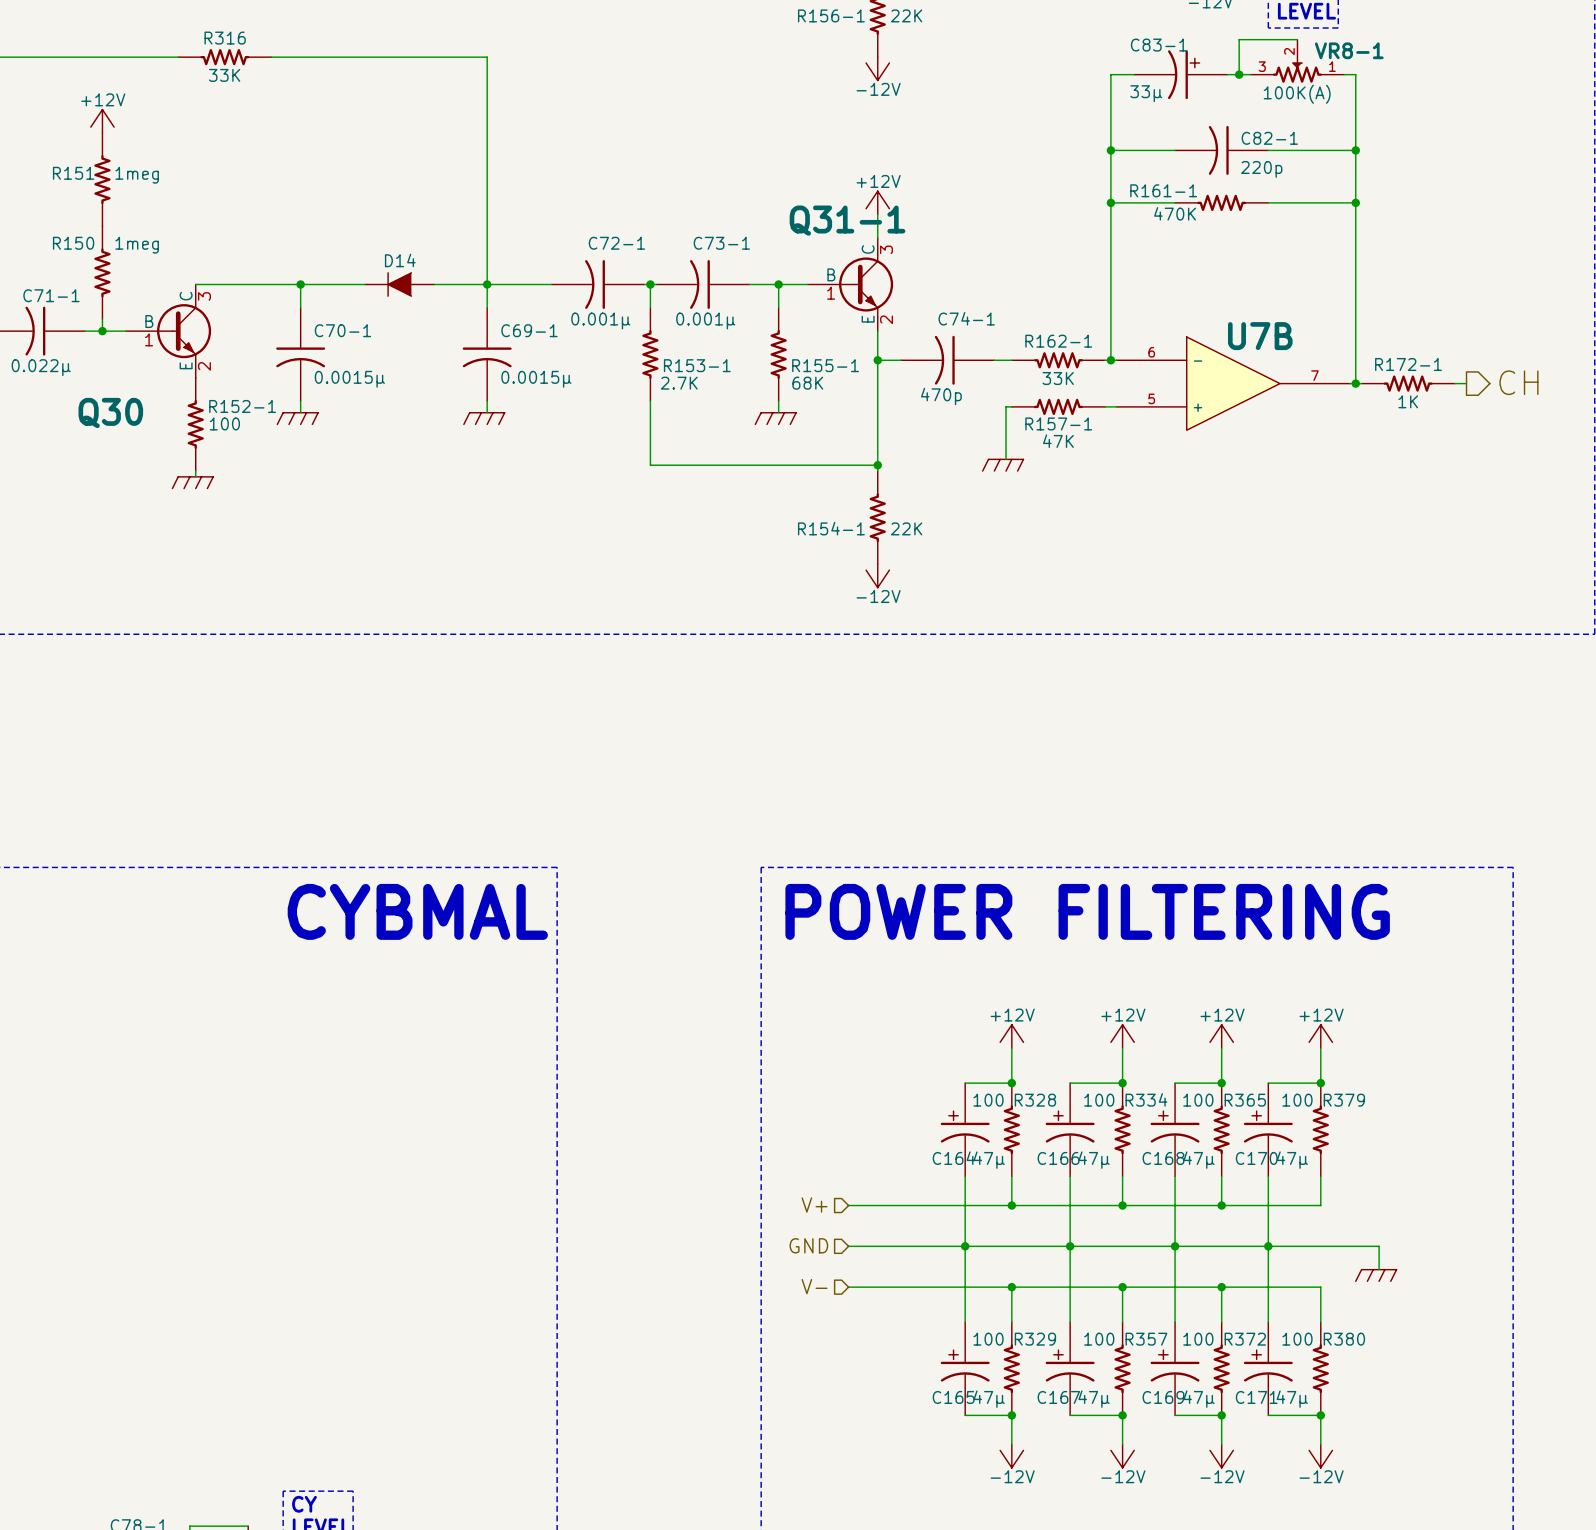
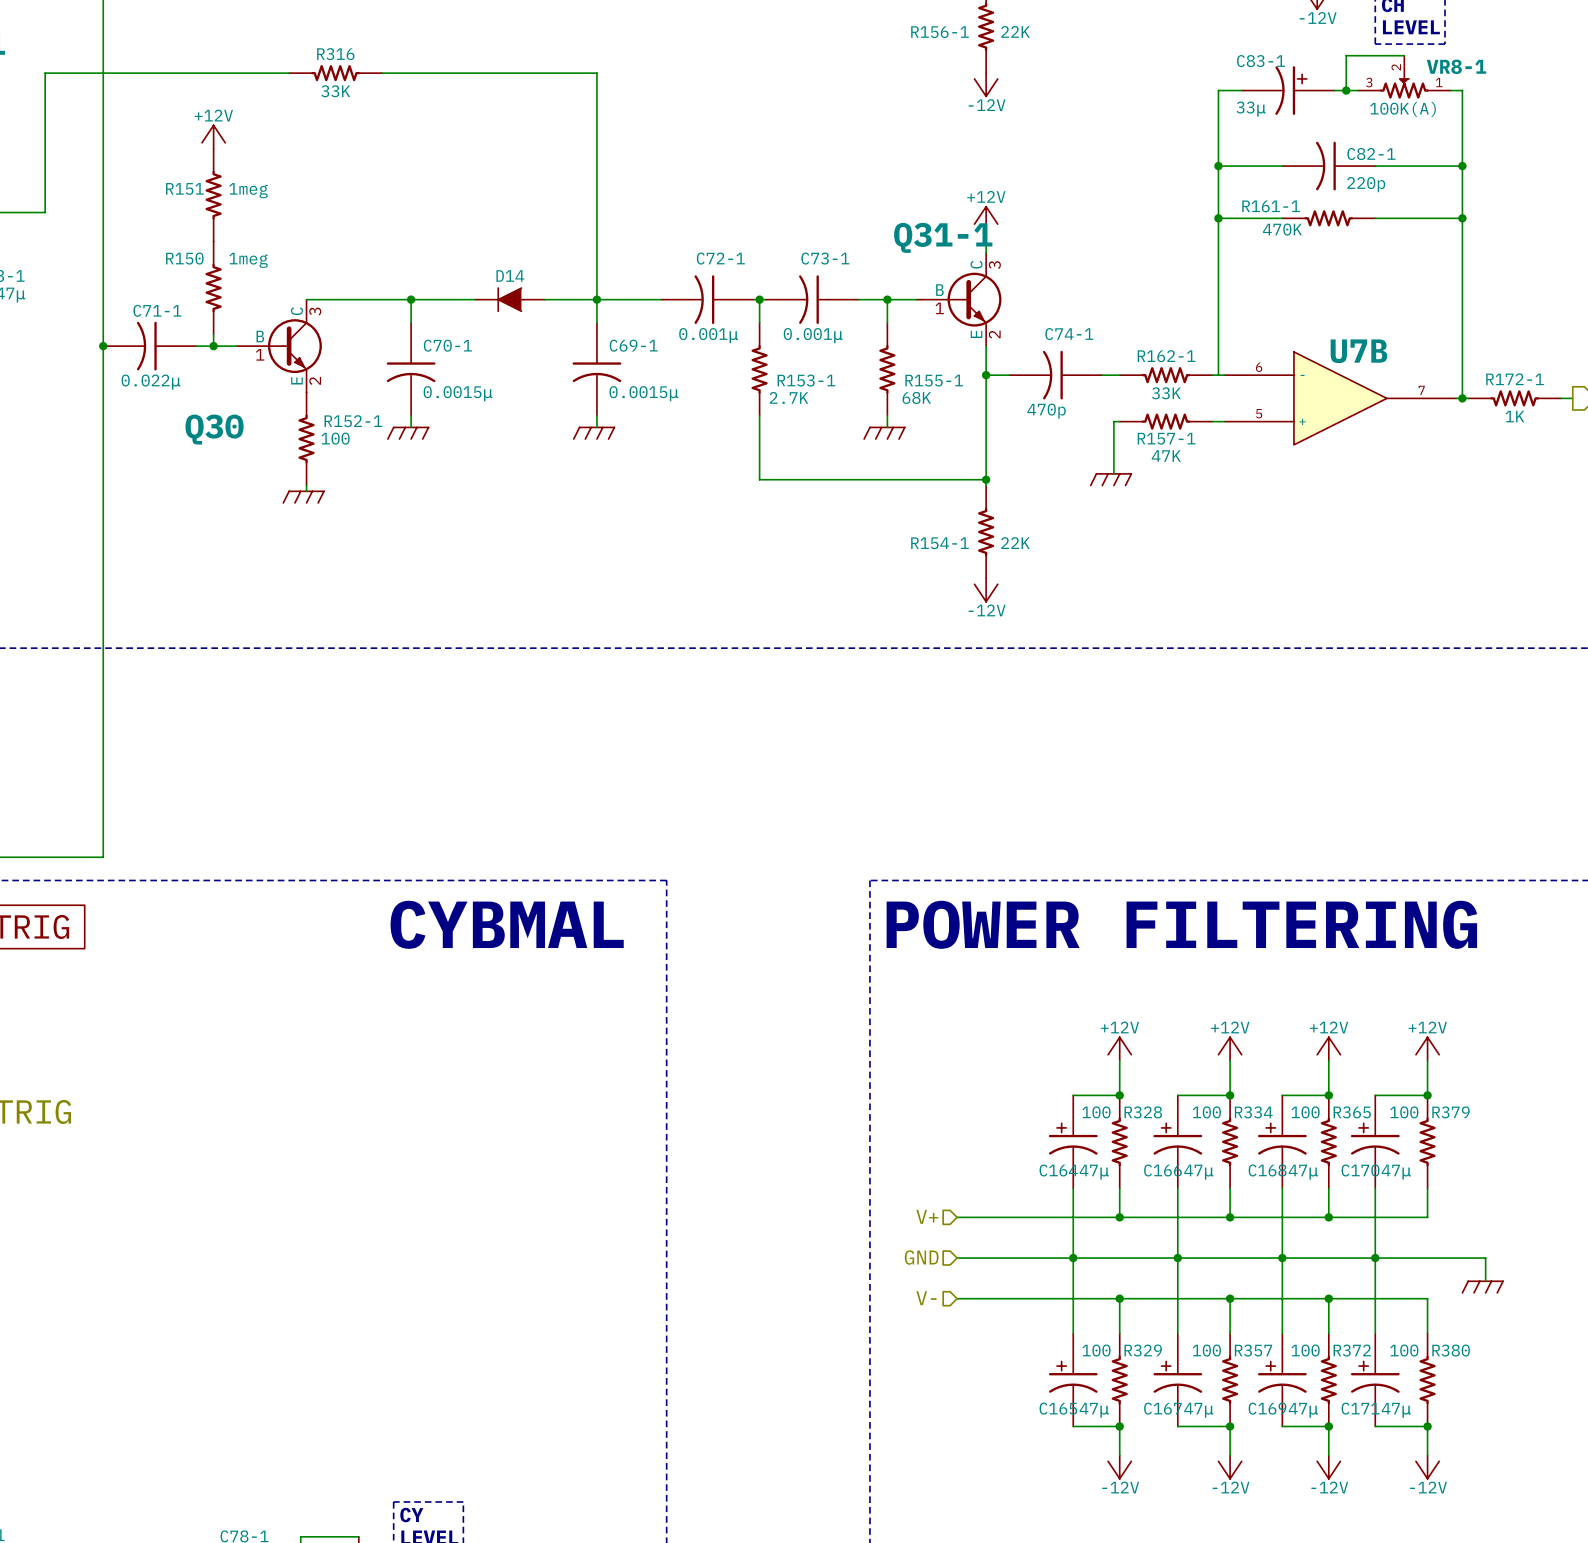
junction: (1110, 360) -> none

